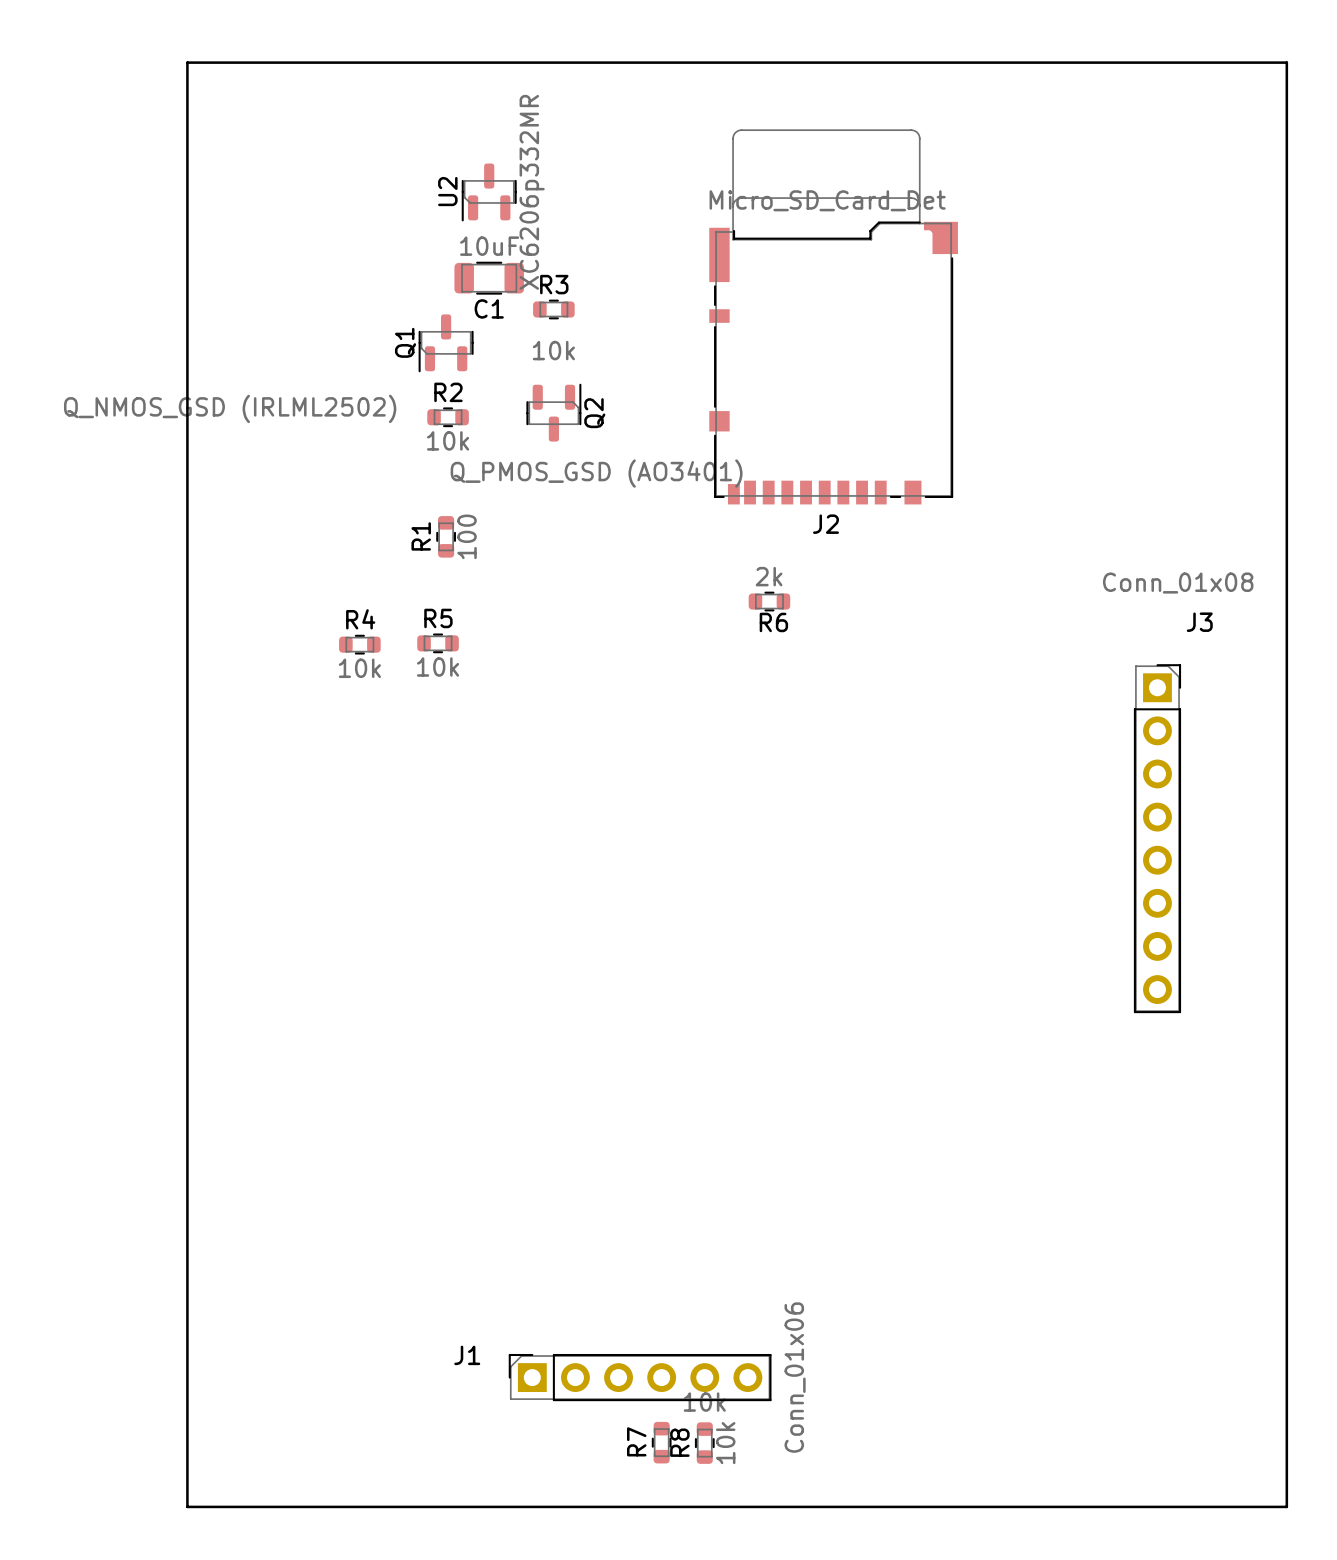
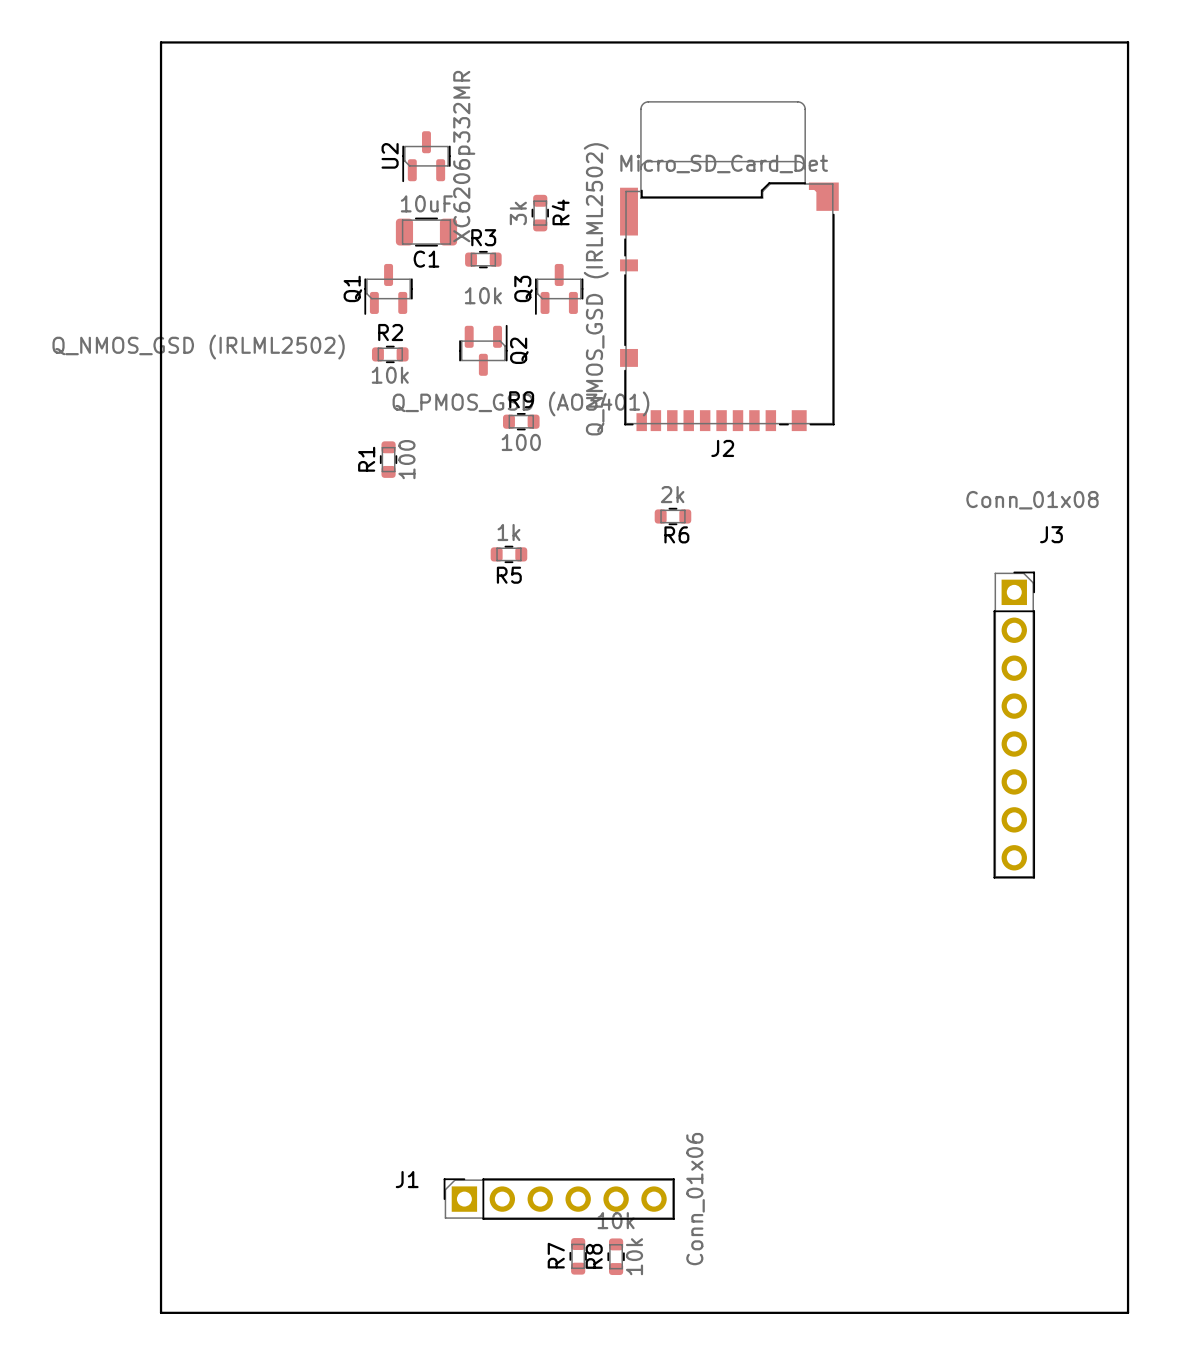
Q3: none -> Q_NMOS_GSD (IRLML2502) (559, 289)
R9: none -> 100 (521, 421)
R5 name position: R5 (438, 618) -> R5 (509, 575)
R5 position: (438, 643) -> (508, 554)
R4 rotation: 0° (359, 644) -> 90° clockwise (540, 213)
R4 position: (359, 644) -> (540, 213)
R5 value: 10k (438, 667) -> 1k (508, 532)
R4 value: 10k (359, 668) -> 3k (518, 213)

